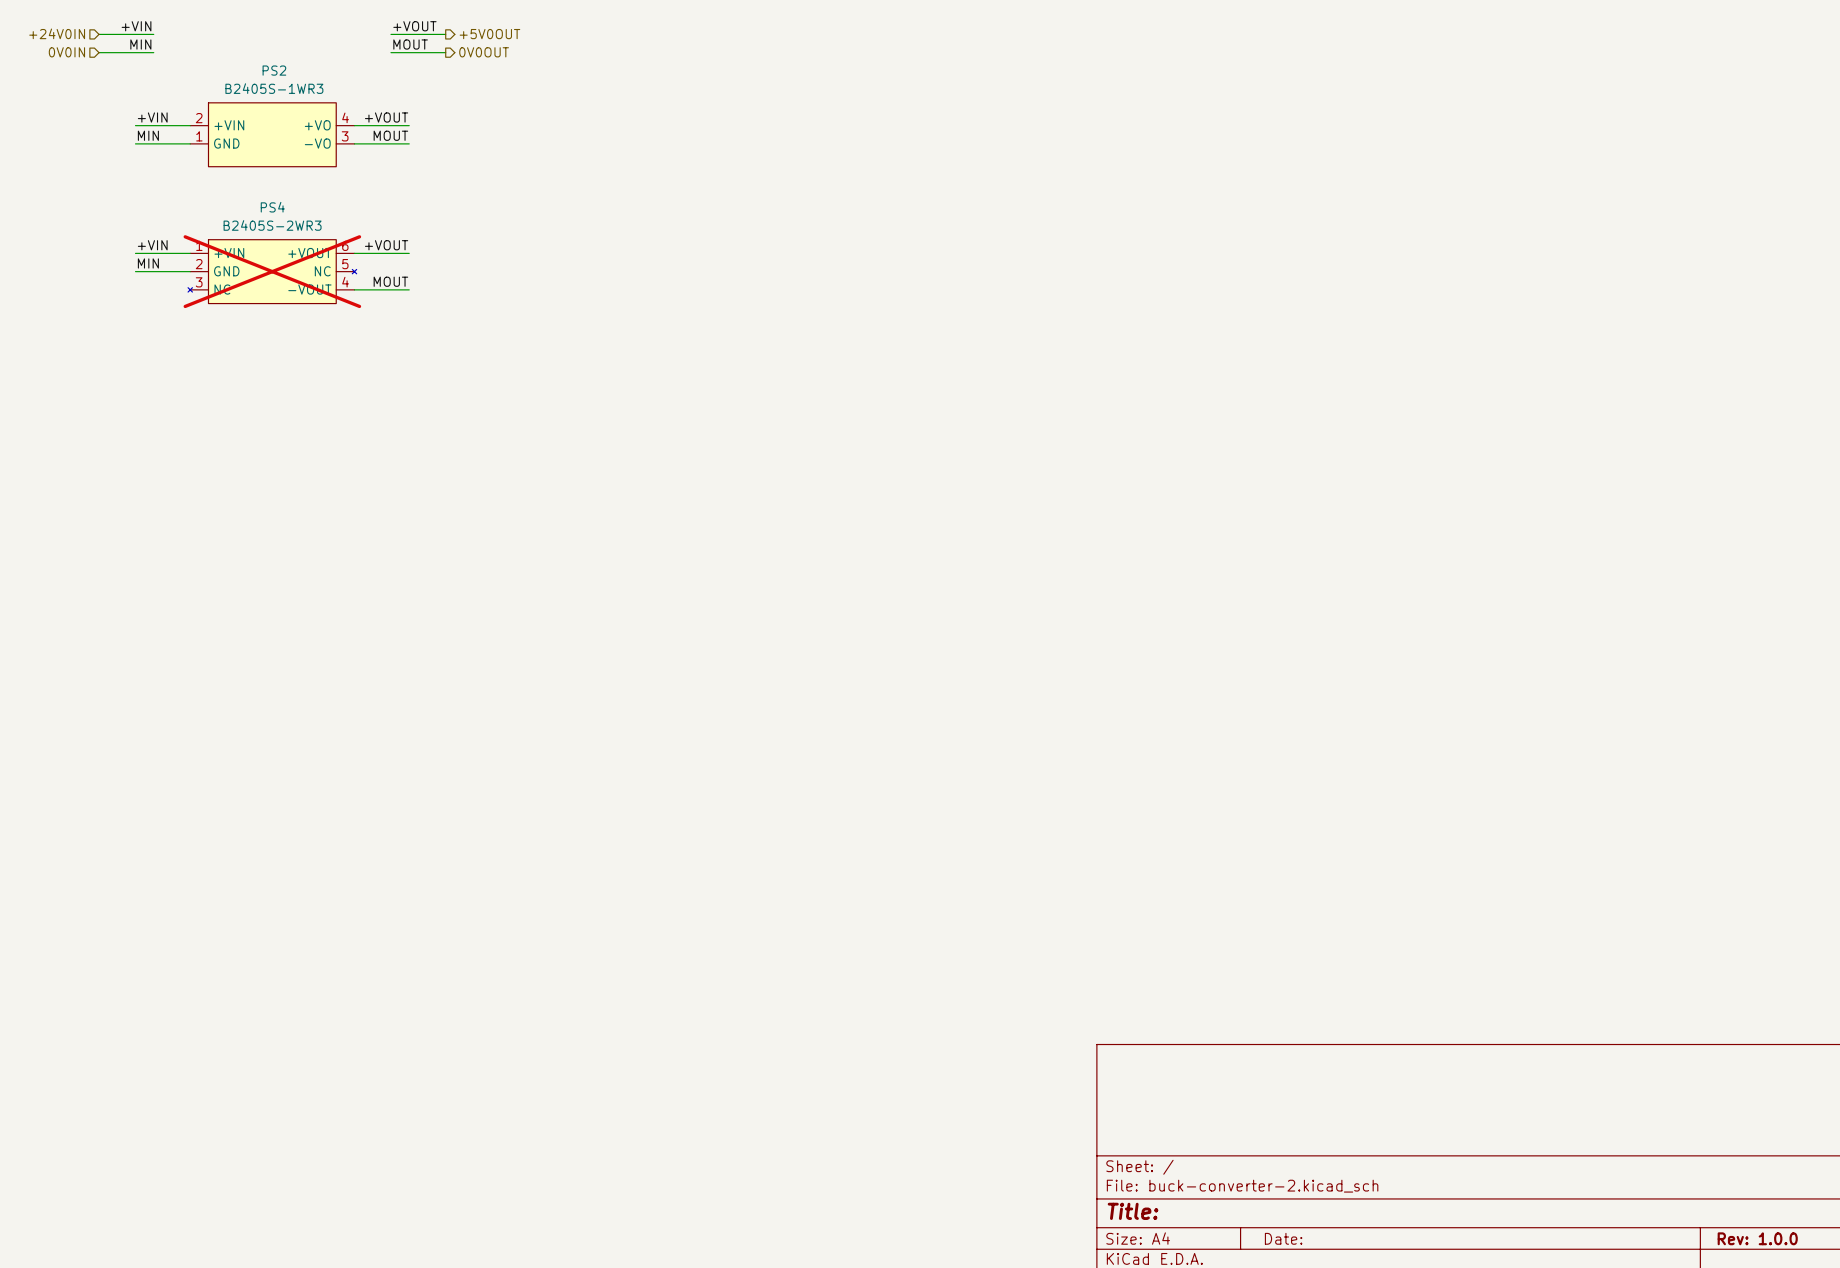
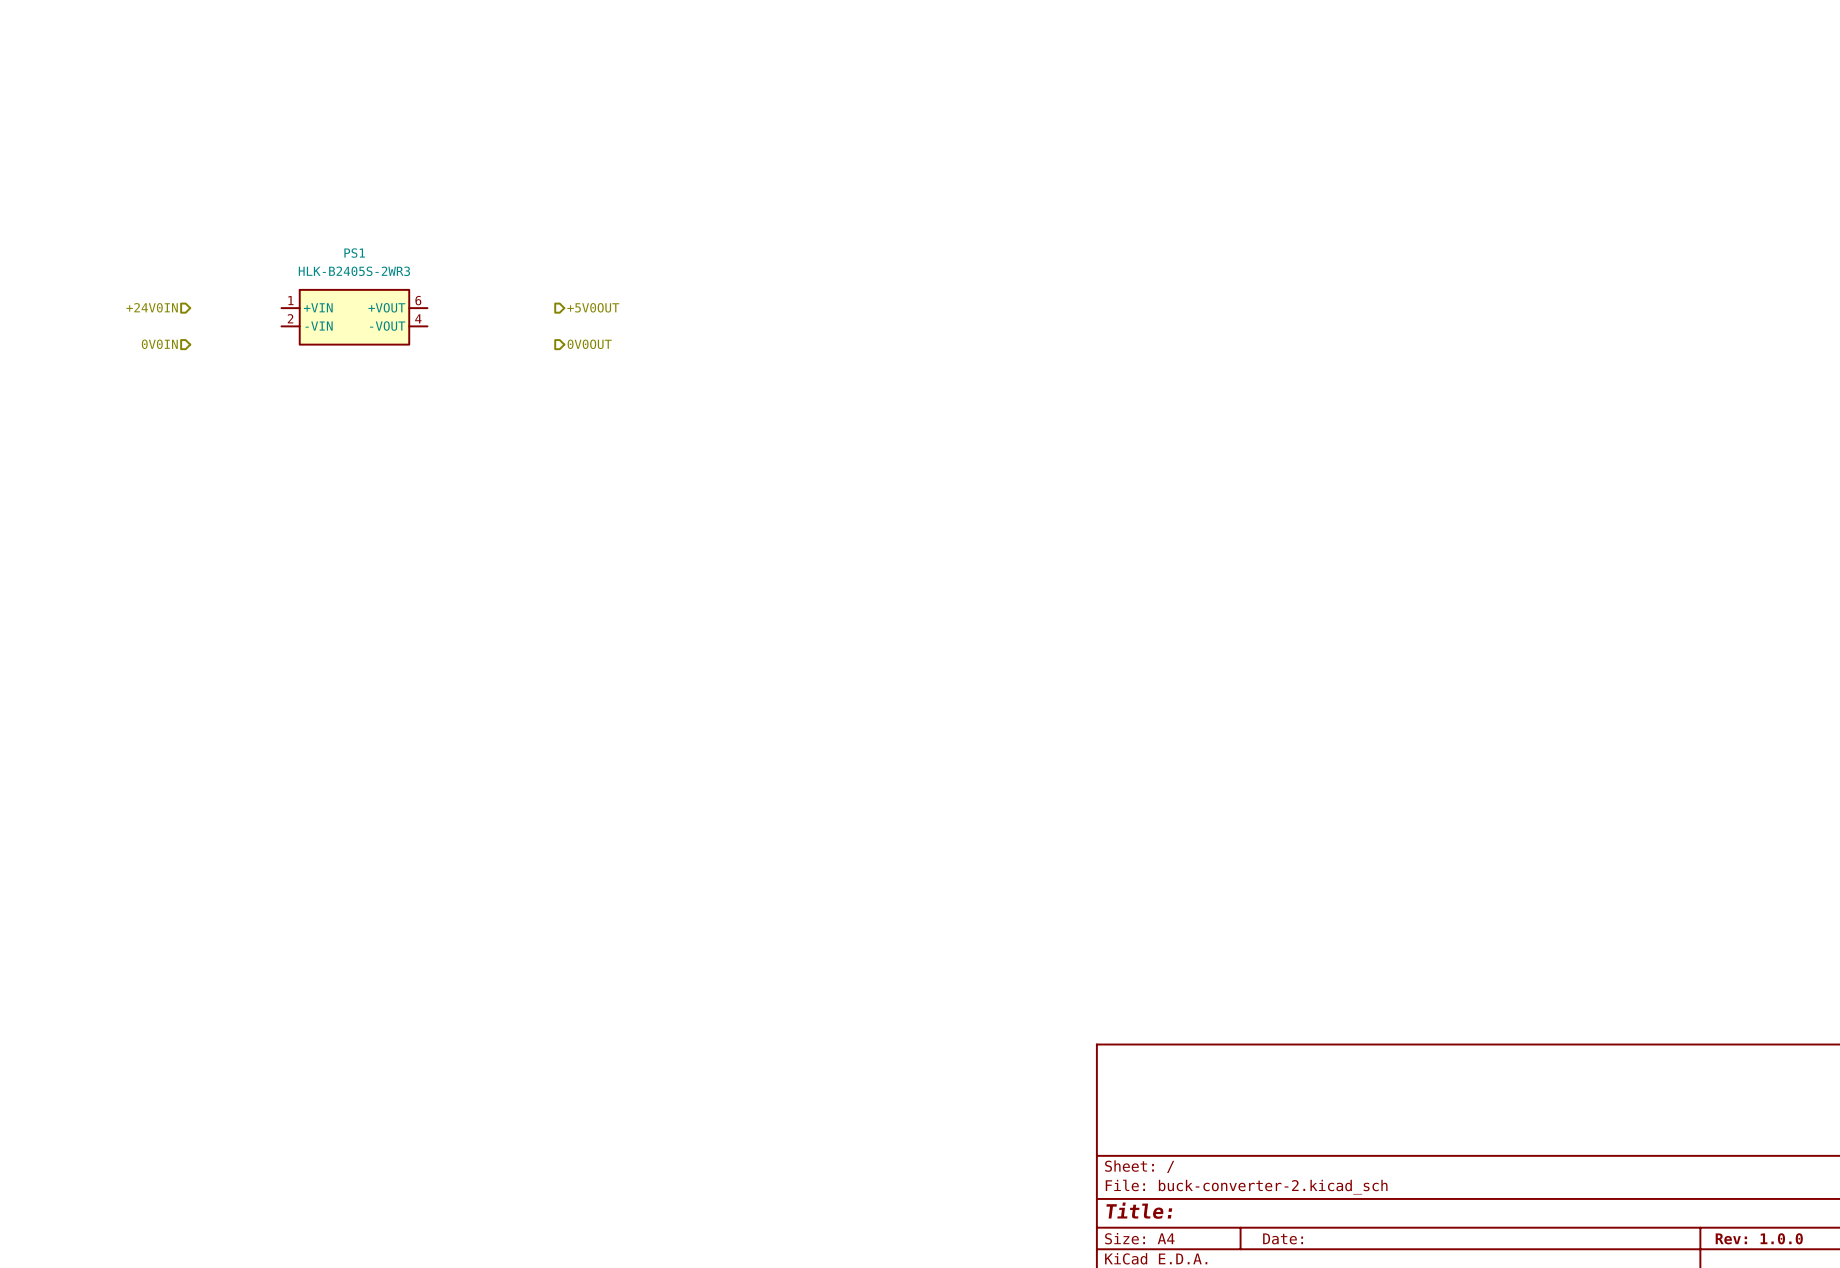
label: +VIN (136, 26) -> none
label: +VOUT (414, 26) -> none
hierarchical label: +24V0IN (57, 33) -> none
wire: (99, 34) (153, 34) -> none
wire: (390, 34) (445, 34) -> none
hierarchical label: +5V0OUT (489, 34) -> none
label: MIN (140, 44) -> none
label: MOUT (410, 44) -> none
hierarchical label: 0V0IN (66, 52) -> none
wire: (99, 52) (153, 52) -> none
wire: (390, 52) (445, 52) -> none
hierarchical label: 0V0OUT (484, 52) -> none
label: +VIN (152, 117) -> none
label: +VOUT (386, 117) -> none
wire: (135, 125) (190, 125) -> none
wire: (354, 125) (409, 125) -> none
PS2: B2405S-1WR3 (272, 134) -> none
label: MIN (148, 135) -> none
label: MOUT (390, 135) -> none
wire: (135, 143) (190, 143) -> none
wire: (354, 143) (409, 143) -> none
label: +VIN (152, 245) -> none
label: +VOUT (386, 245) -> none
wire: (135, 253) (190, 253) -> none
wire: (354, 253) (409, 253) -> none
label: MIN (148, 263) -> none
wire: (135, 271) (190, 271) -> none
PS4: B2405S-2WR3 (272, 271) -> none
label: MOUT (390, 281) -> none
hierarchical label: none -> +24V0IN (152, 307)
hierarchical label: none -> +5V0OUT (593, 307)
PS1: none -> HLK-B2405S-2WR3 (354, 317)
hierarchical label: none -> 0V0IN (159, 344)
hierarchical label: none -> 0V0OUT (589, 344)

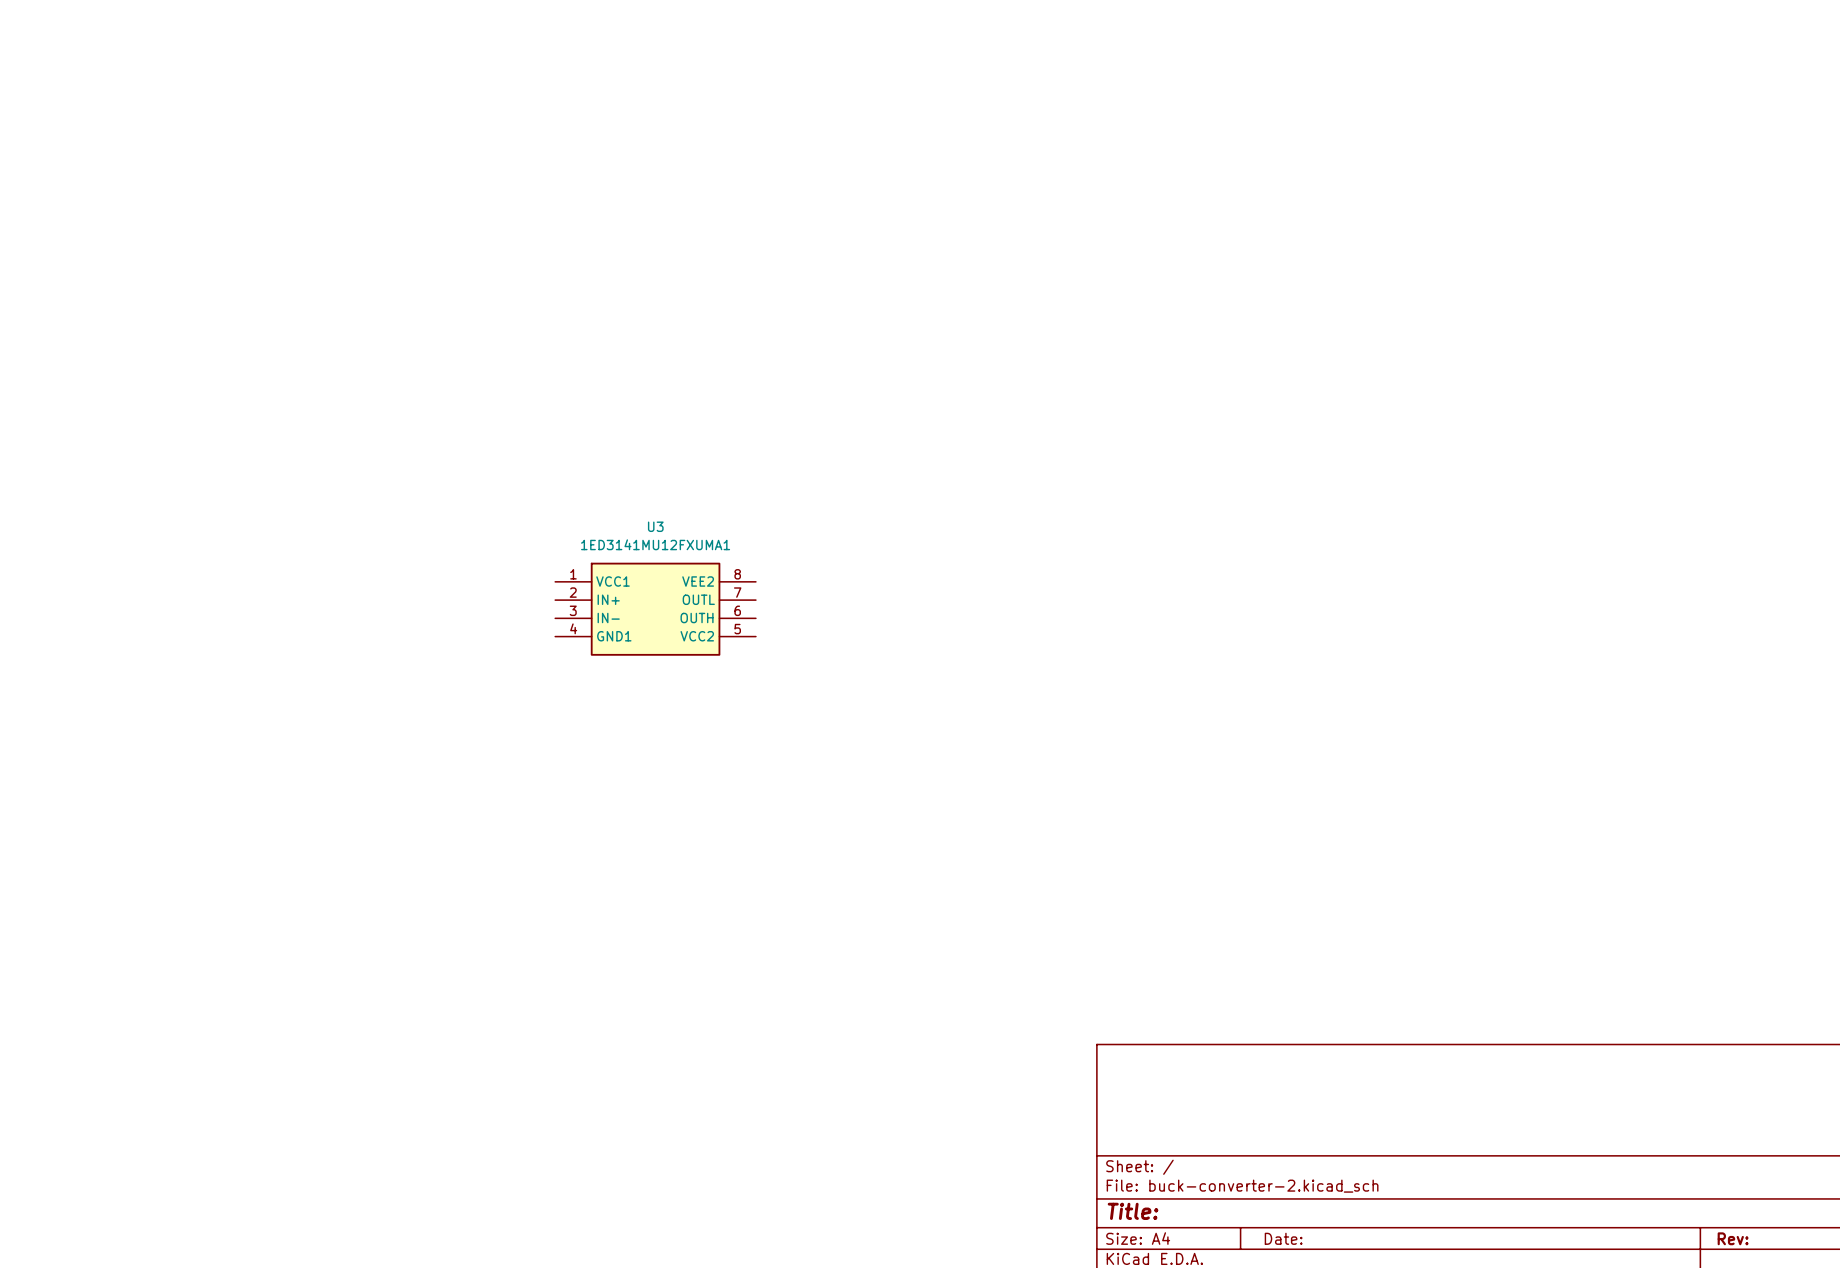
hierarchical label: +24V0IN (152, 307) -> none
hierarchical label: +5V0OUT (593, 307) -> none
PS1: HLK-B2405S-2WR3 (354, 317) -> none
hierarchical label: 0V0IN (159, 344) -> none
hierarchical label: 0V0OUT (589, 344) -> none
U3: none -> 1ED3141MU12FXUMA1 (655, 609)
title block: Rev: 1.0.0 (1759, 1238) -> Rev: (1733, 1238)

